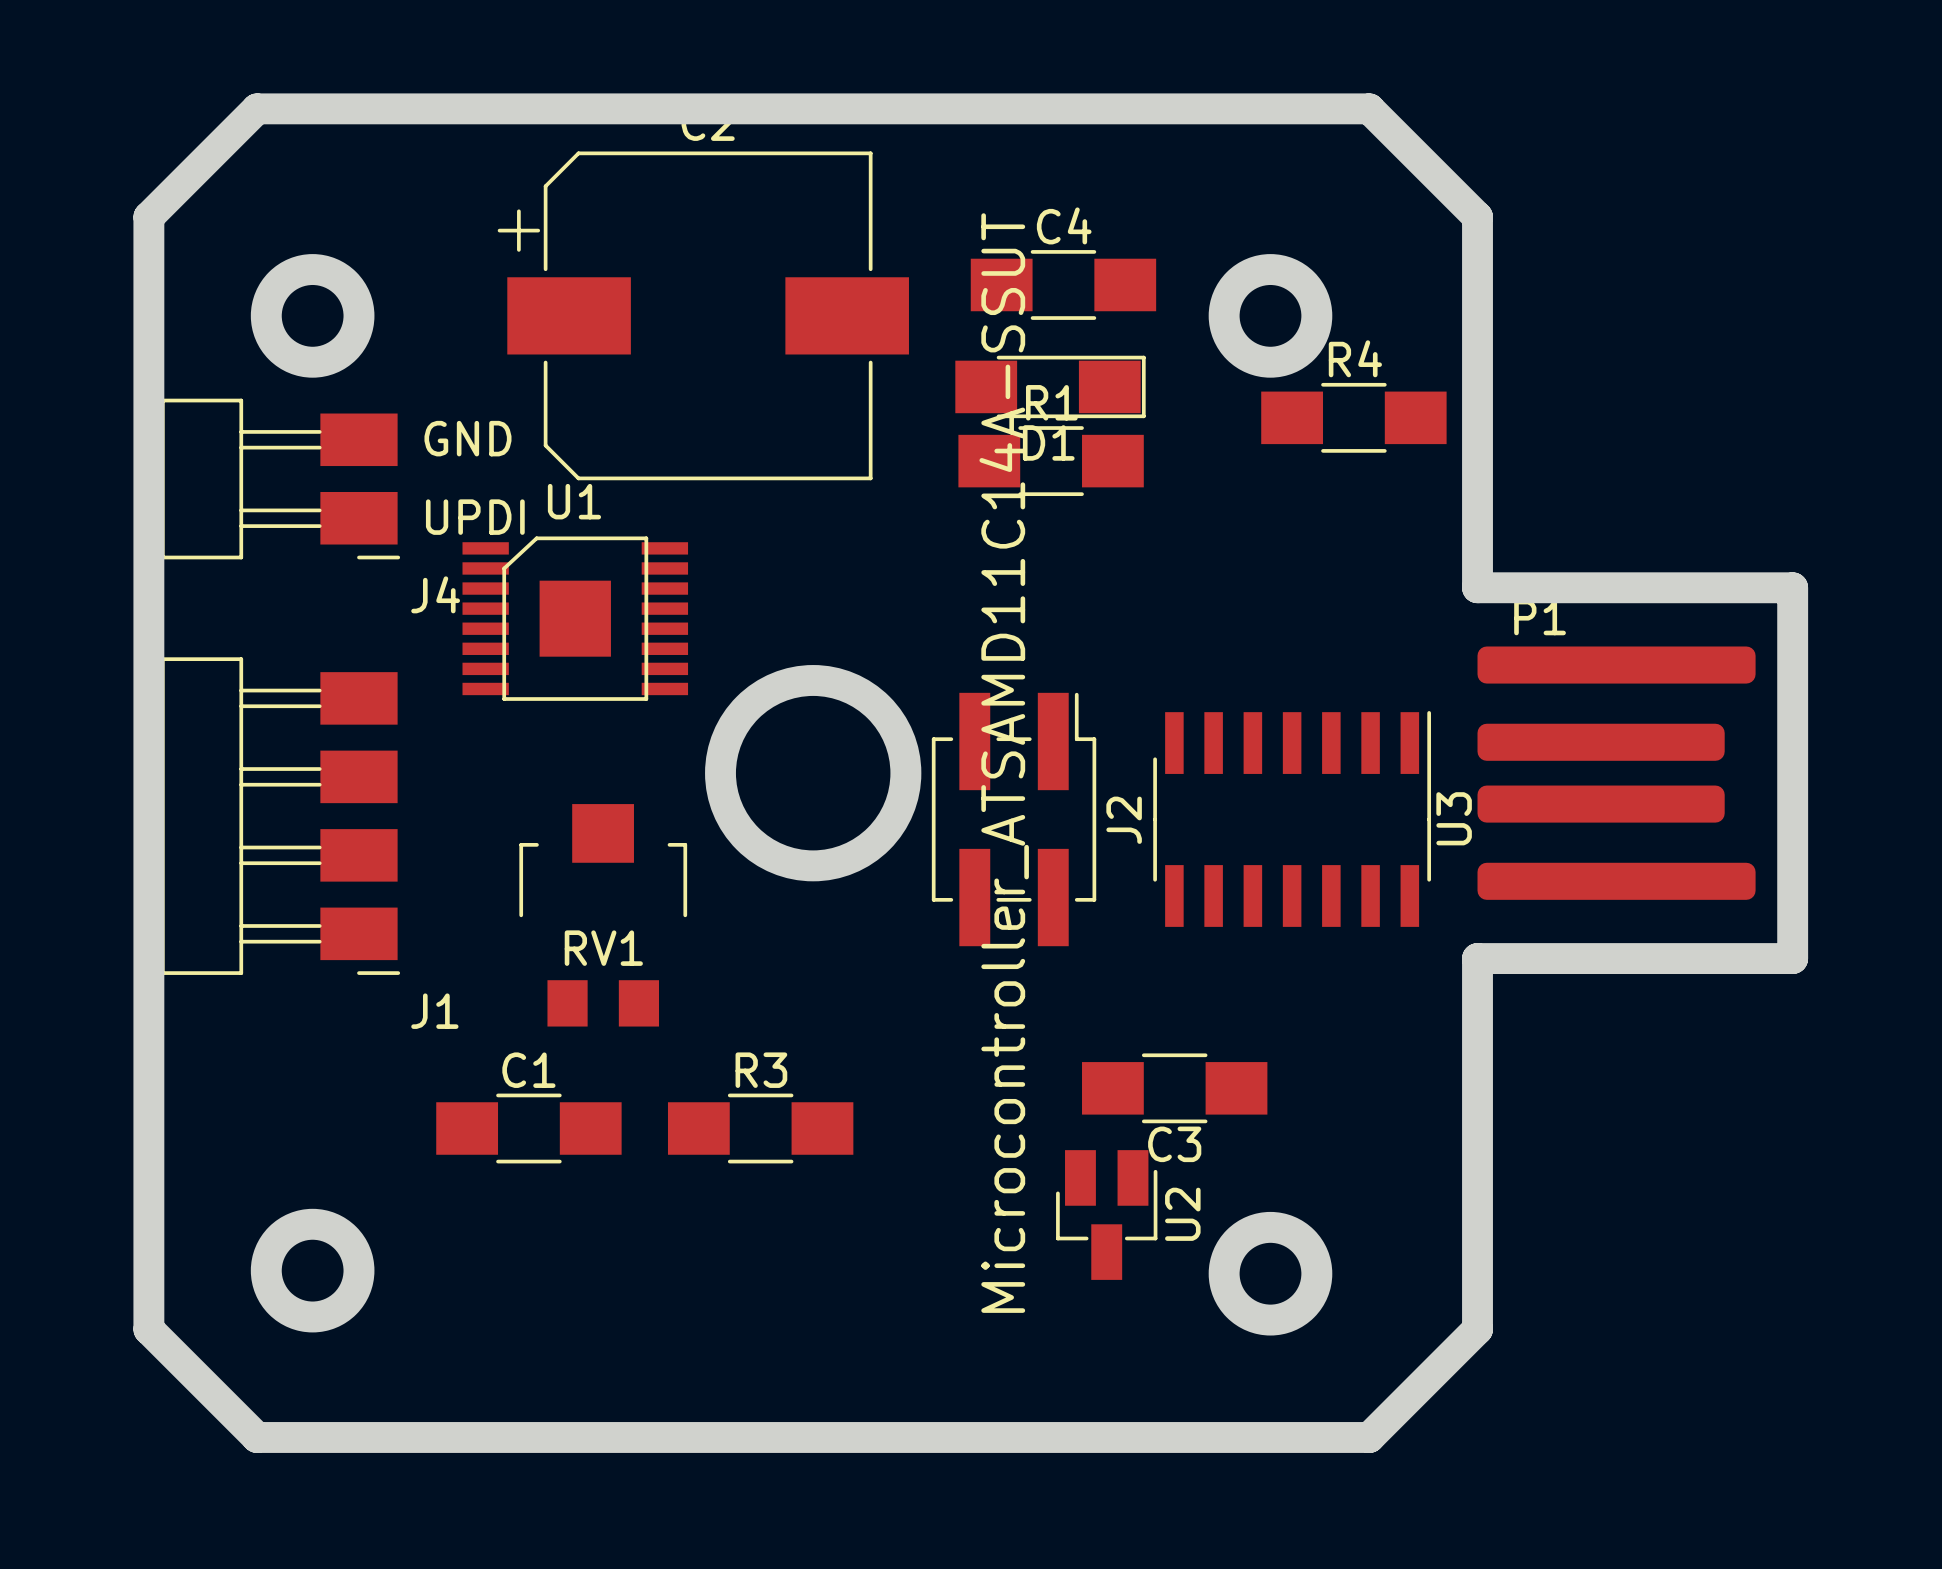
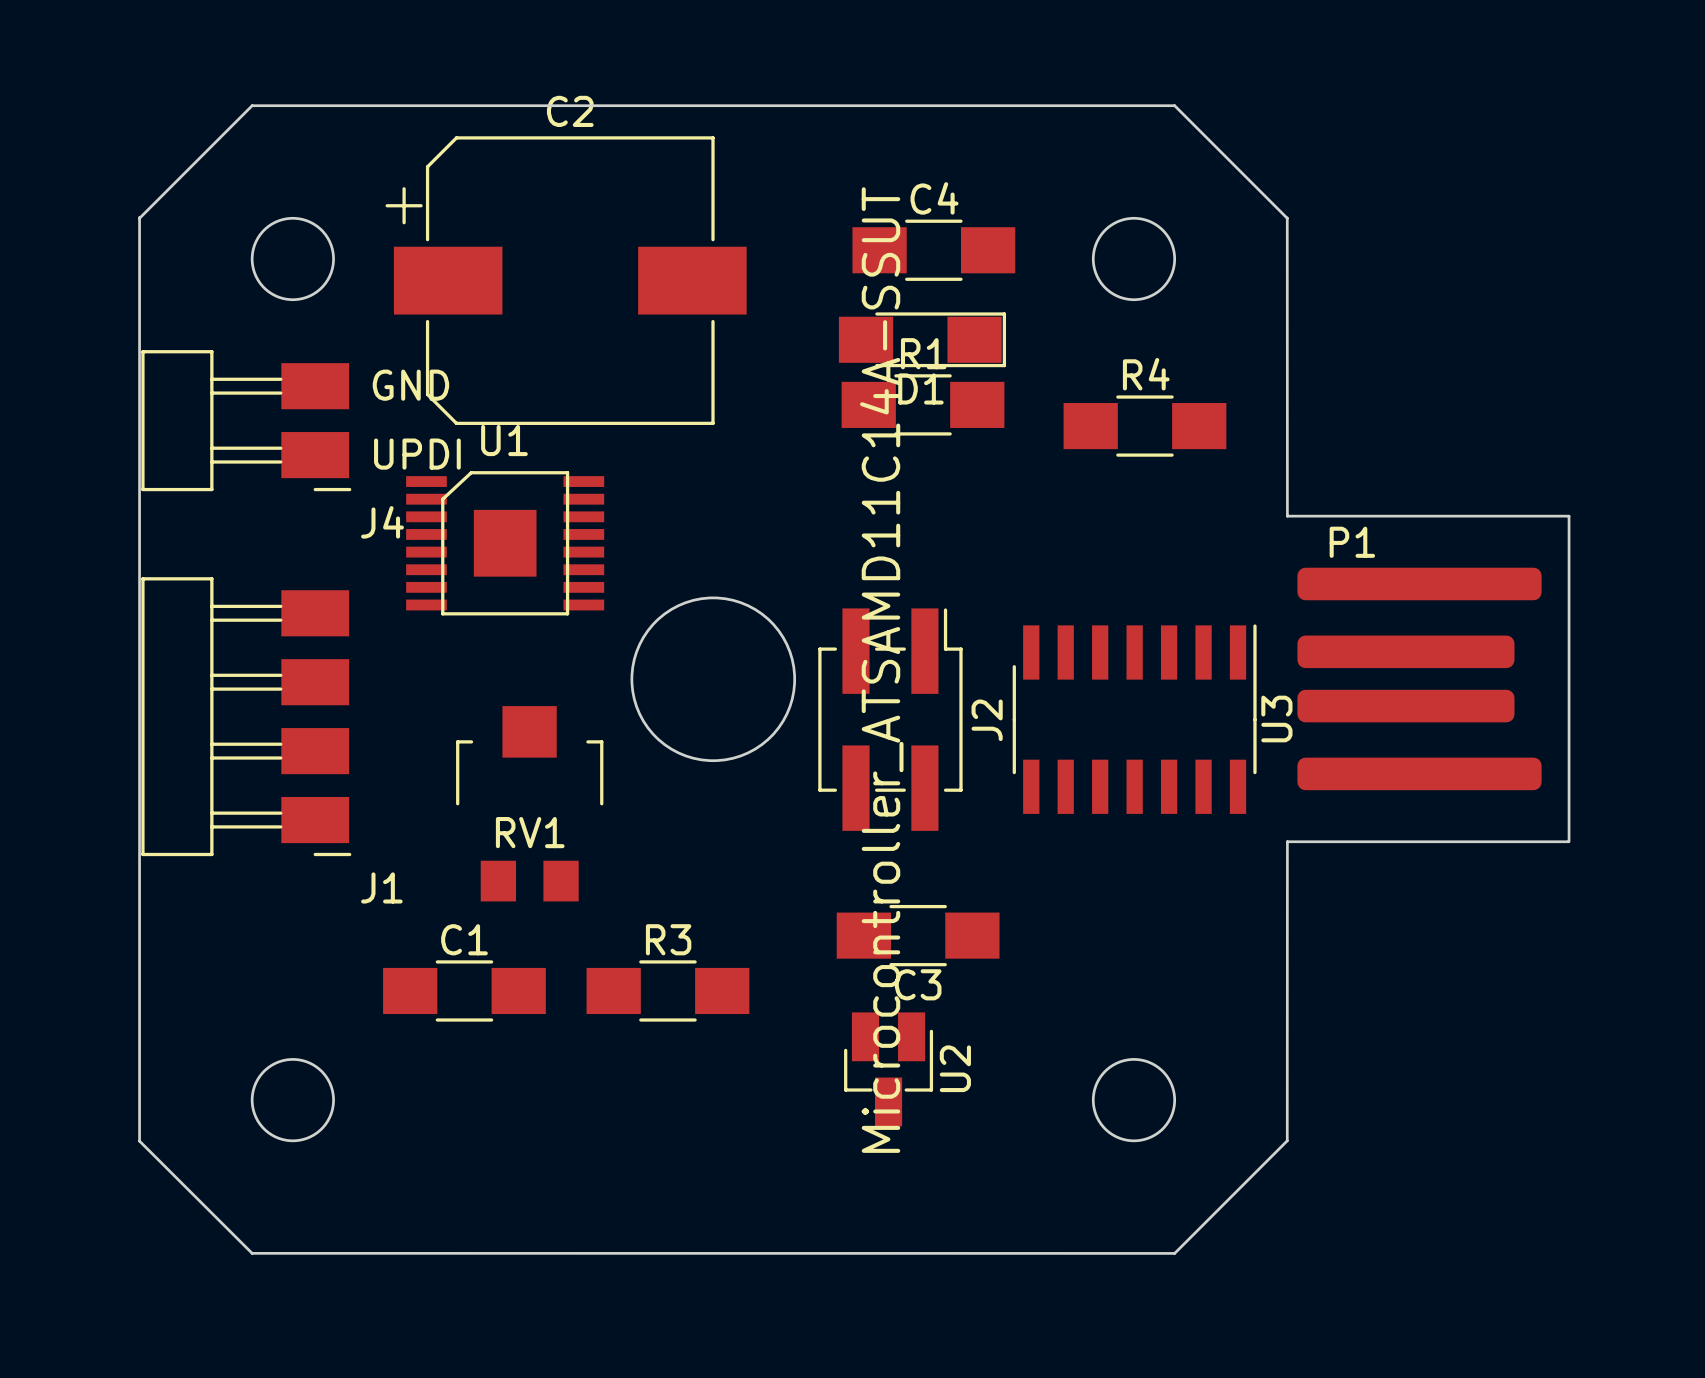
board edge: none -> (139, 217) (139, 1141) (252, 1253) (1174, 1253) (1287, 1140) (1287, 841) (1297, 841)
board edge: none -> (139, 218) (252, 105) (1174, 105) (1287, 218)
round board edge size: [250, 254, 375, 378] -> [250, 216, 335, 302]
round board edge size: [1208, 254, 1333, 378] -> [1091, 216, 1177, 302]
C2 position: (703, 315) -> (566, 280)
R4 position: (1353, 417) -> (1144, 426)
round board edge size: [705, 665, 922, 882] -> [630, 596, 797, 763]
board edge: (1477, 958) (1477, 1329) (1369, 1437) (257, 1437) (148, 1329) (148, 217) (257, 108) (1369, 108) (1477, 217) (1477, 587) (1792, 587) (1792, 958) (1786, 958) -> (1287, 217) (1287, 516) (1569, 516) (1569, 841)
board edge width: thick (1477, 958) (1786, 958) -> thin (1297, 841) (1568, 841)
C3 position: (1174, 1088) -> (918, 935)
round board edge size: [250, 1208, 375, 1333] -> [250, 1058, 335, 1143]
round board edge size: [1208, 1211, 1333, 1336] -> [1091, 1058, 1177, 1143]
U2 position: (1106, 1215) -> (888, 1069)

